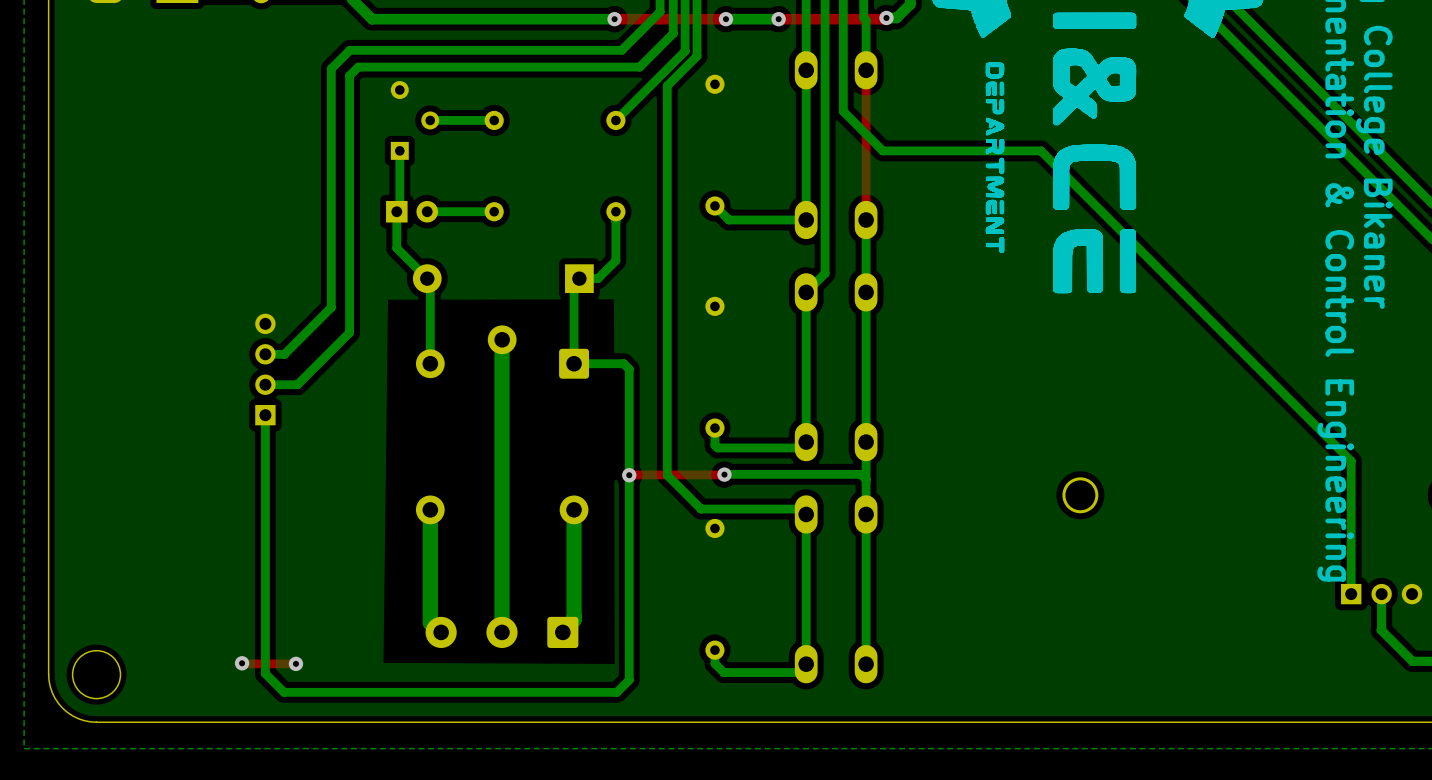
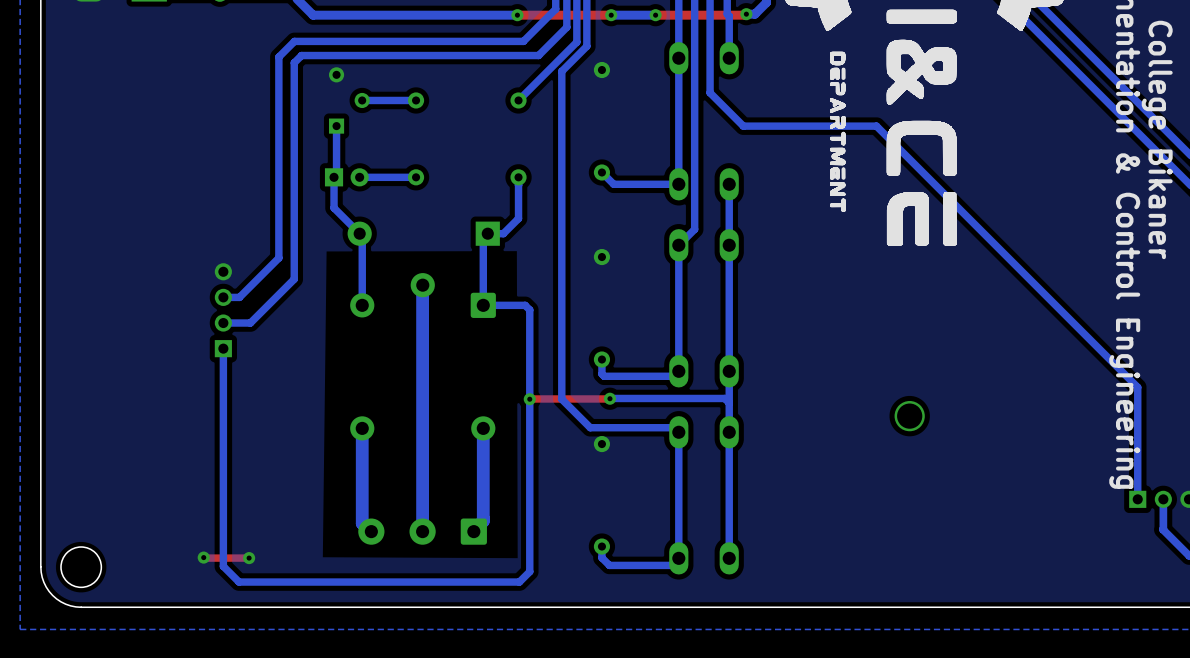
top track: (866, 70) (866, 219) -> none

